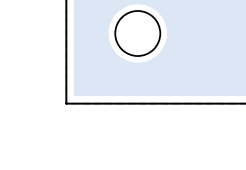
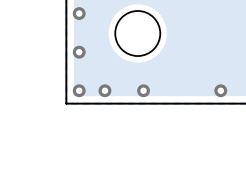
via: none -> (79, 13)
via: none -> (79, 52)
via: none -> (79, 90)
via: none -> (104, 90)
via: none -> (143, 90)
via: none -> (220, 90)

